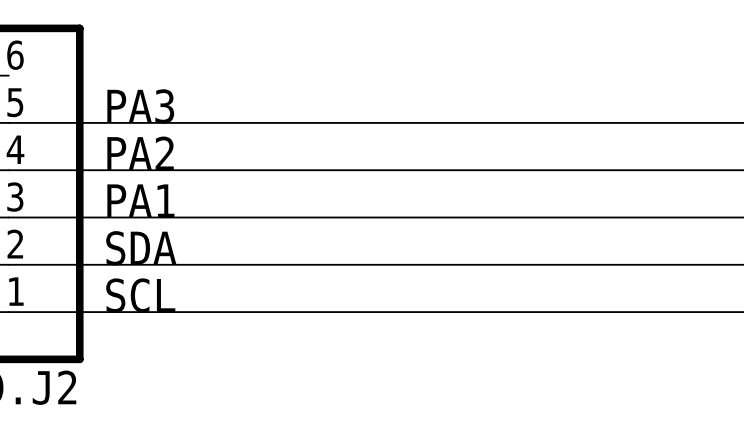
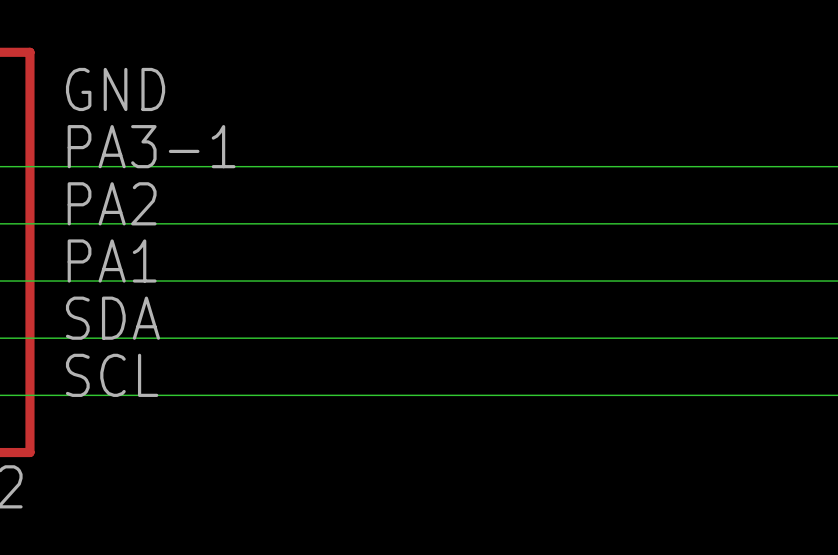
label: none -> GND (115, 89)
label: PA3 (140, 106) -> PA3-1 (151, 146)

